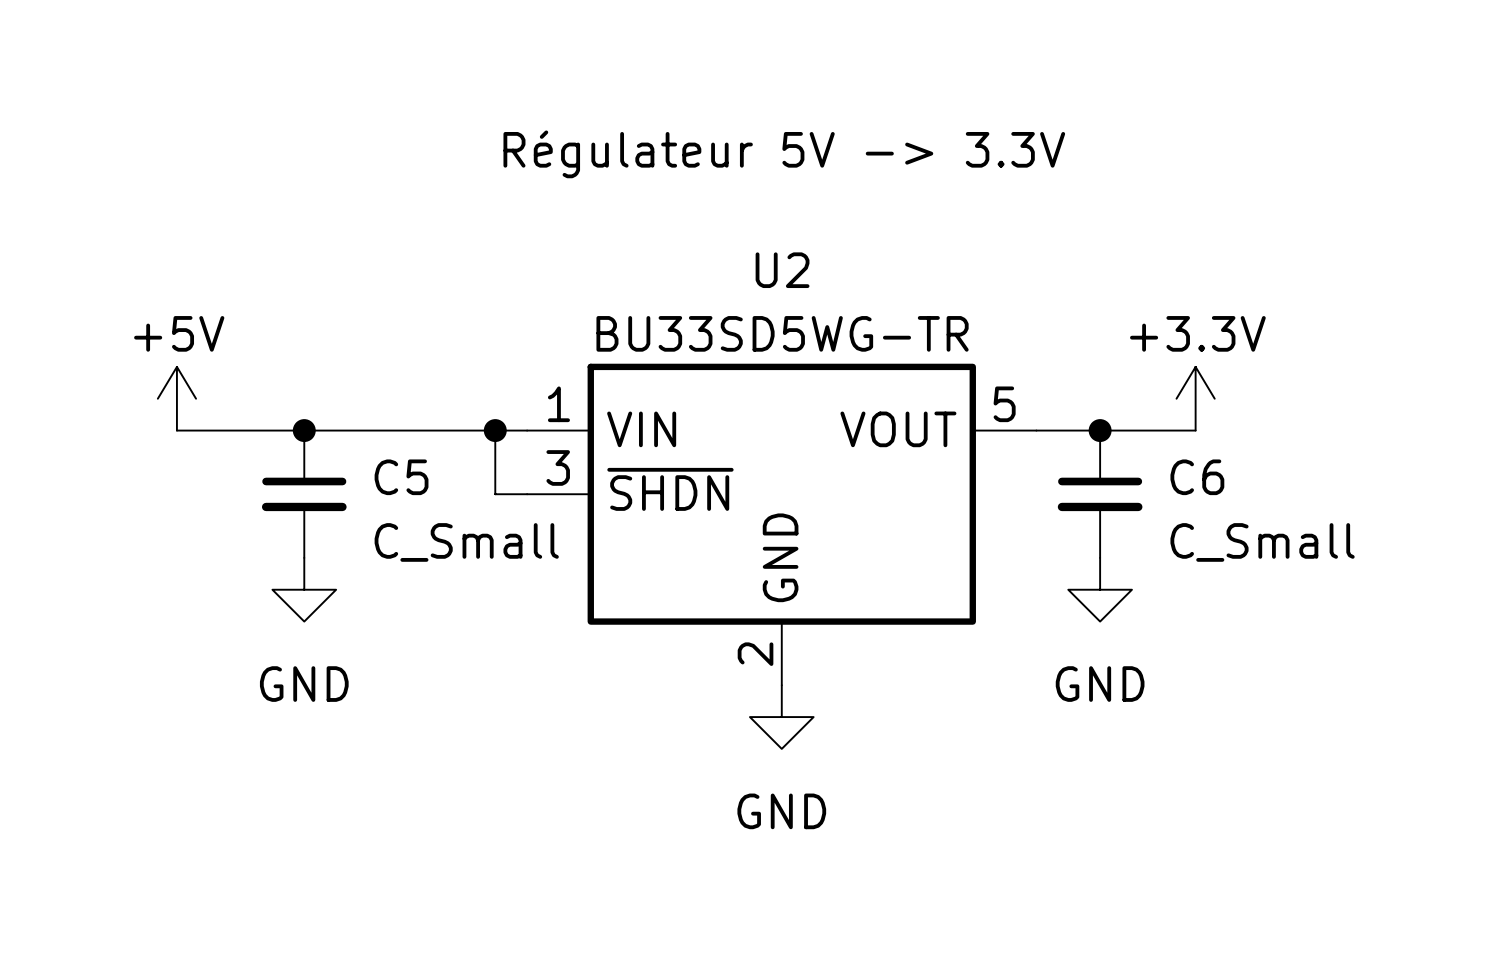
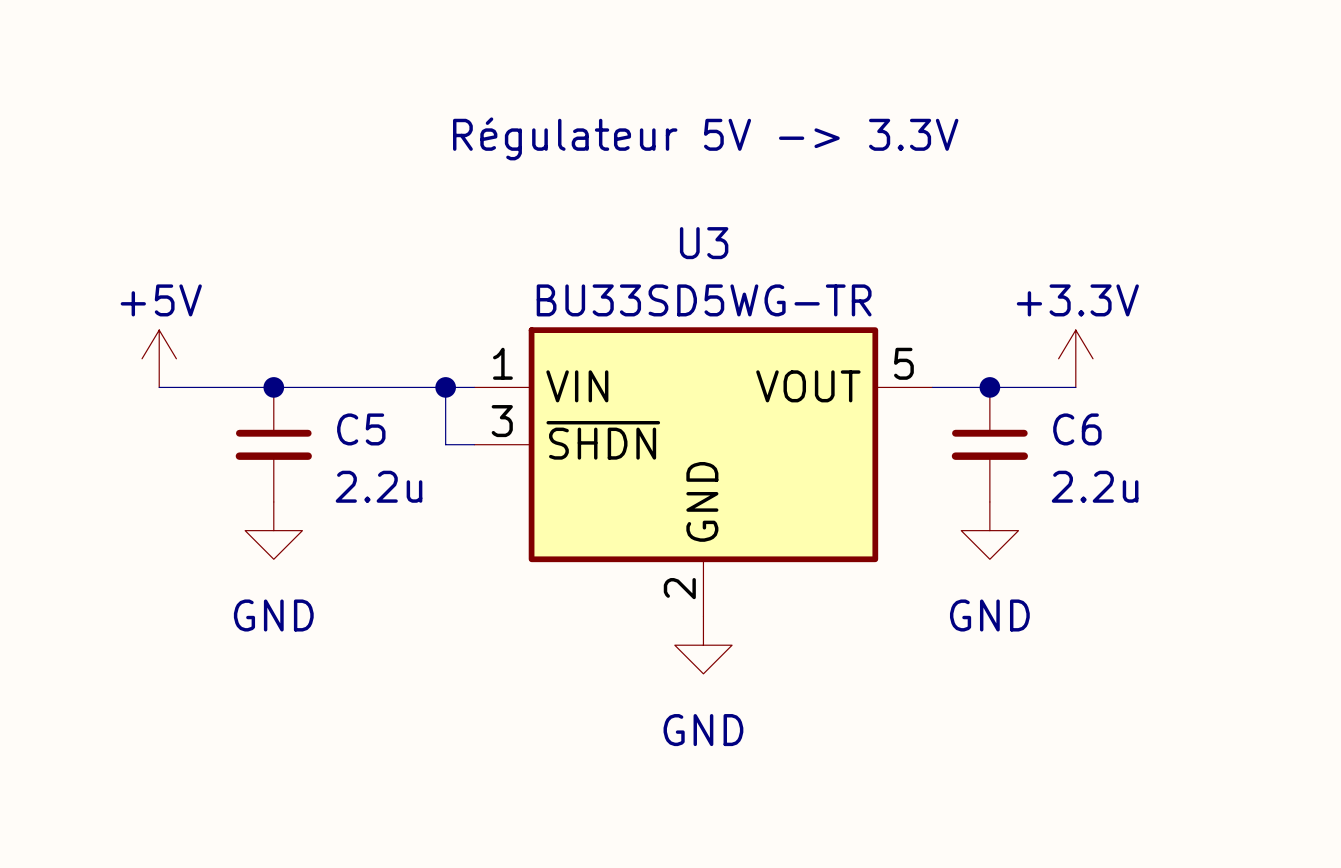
U2 name: U2 (782, 270) -> U3 (704, 243)
C5 value: C_Small (466, 542) -> 2.2u (379, 486)
C6 value: C_Small (1262, 542) -> 2.2u (1095, 486)

